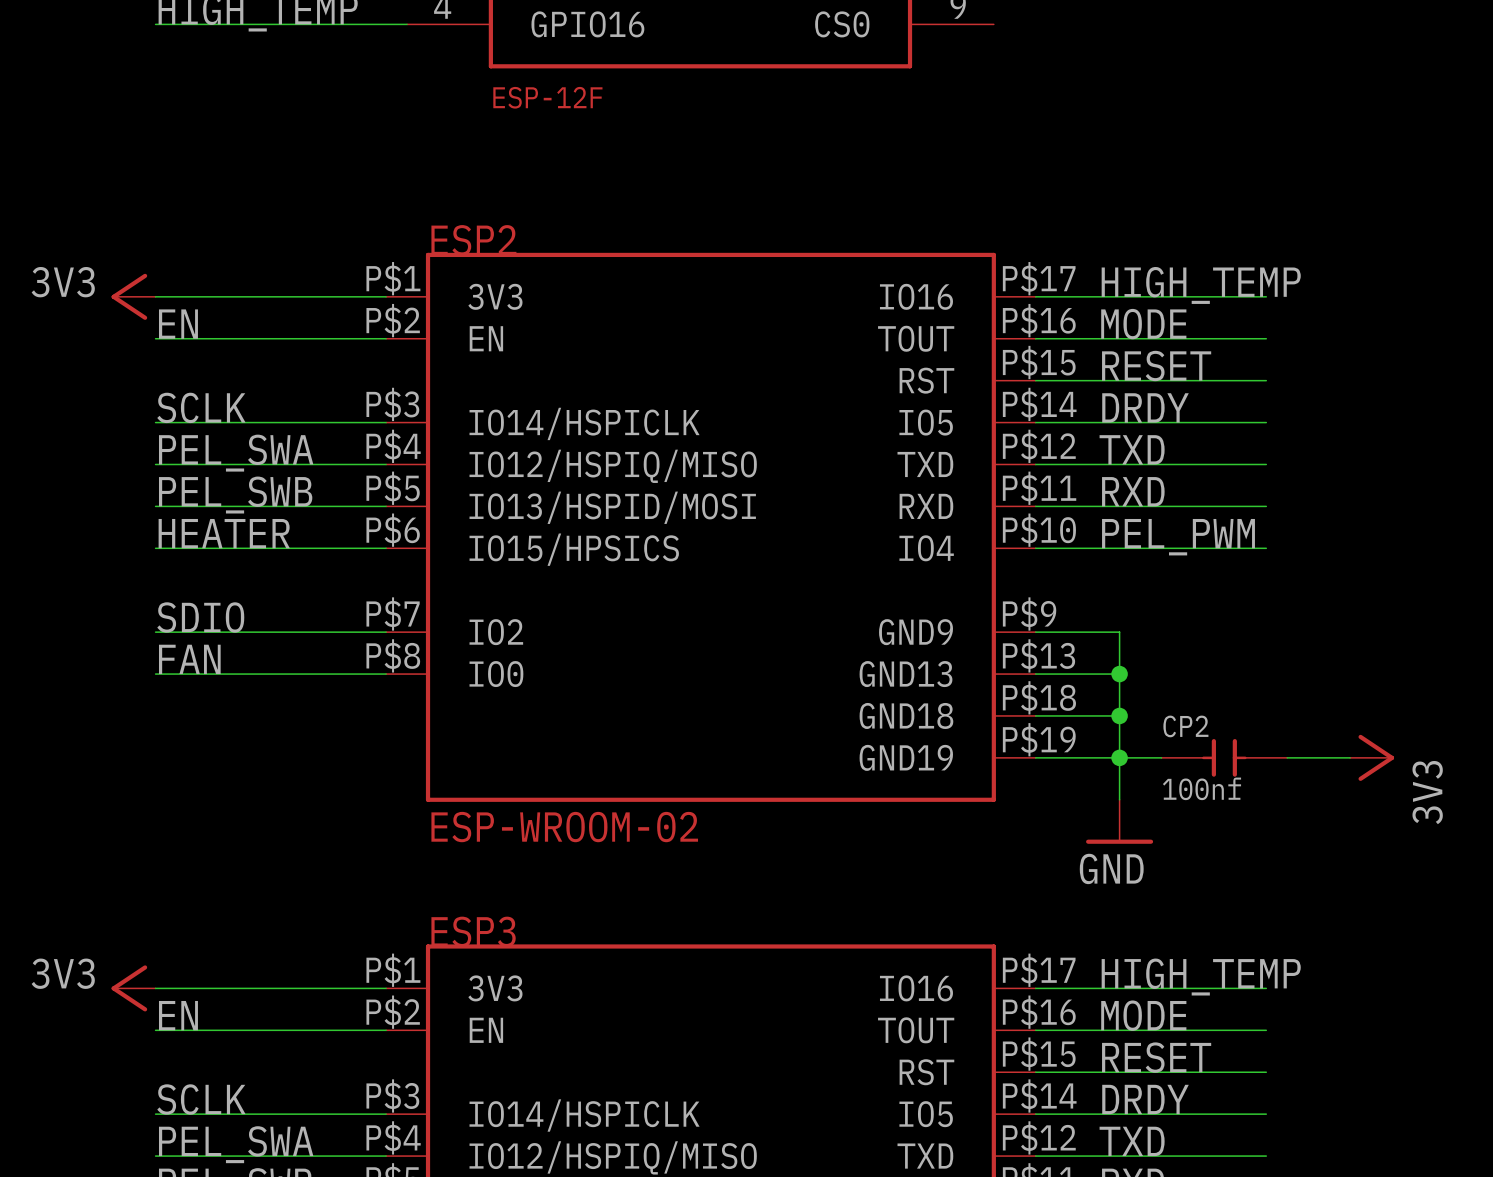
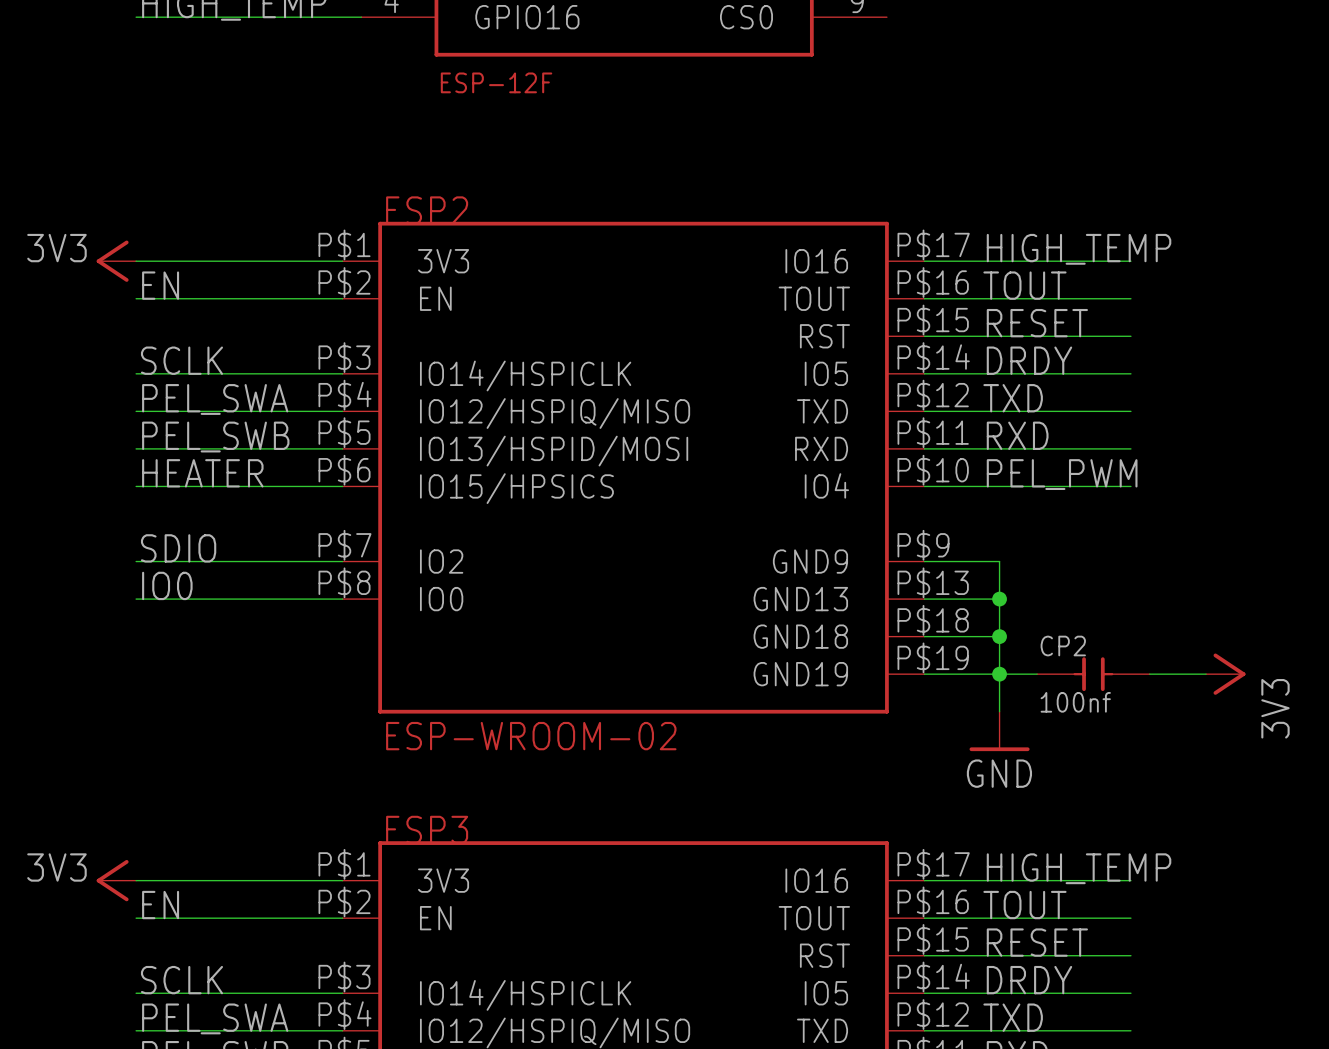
label: MODE (1143, 324) -> TOUT (1024, 285)
label: FAN (189, 659) -> IO0 (167, 585)
label: MODE (1143, 1015) -> TOUT (1024, 905)

